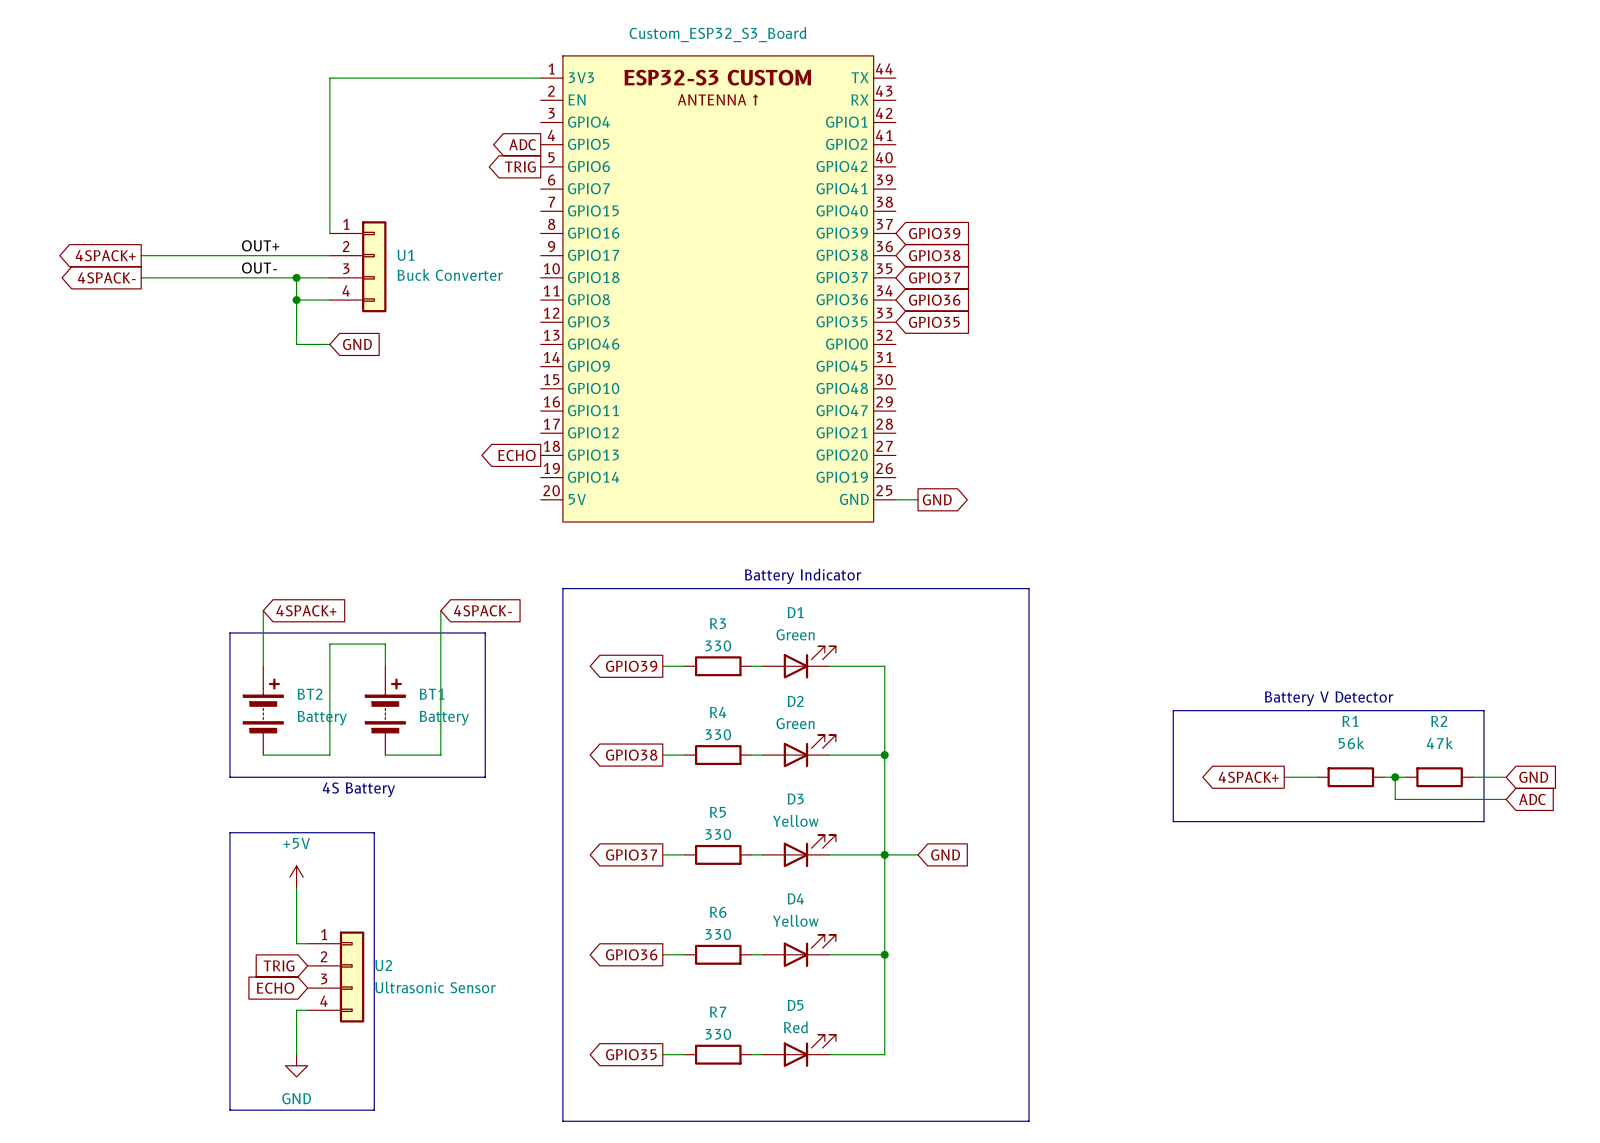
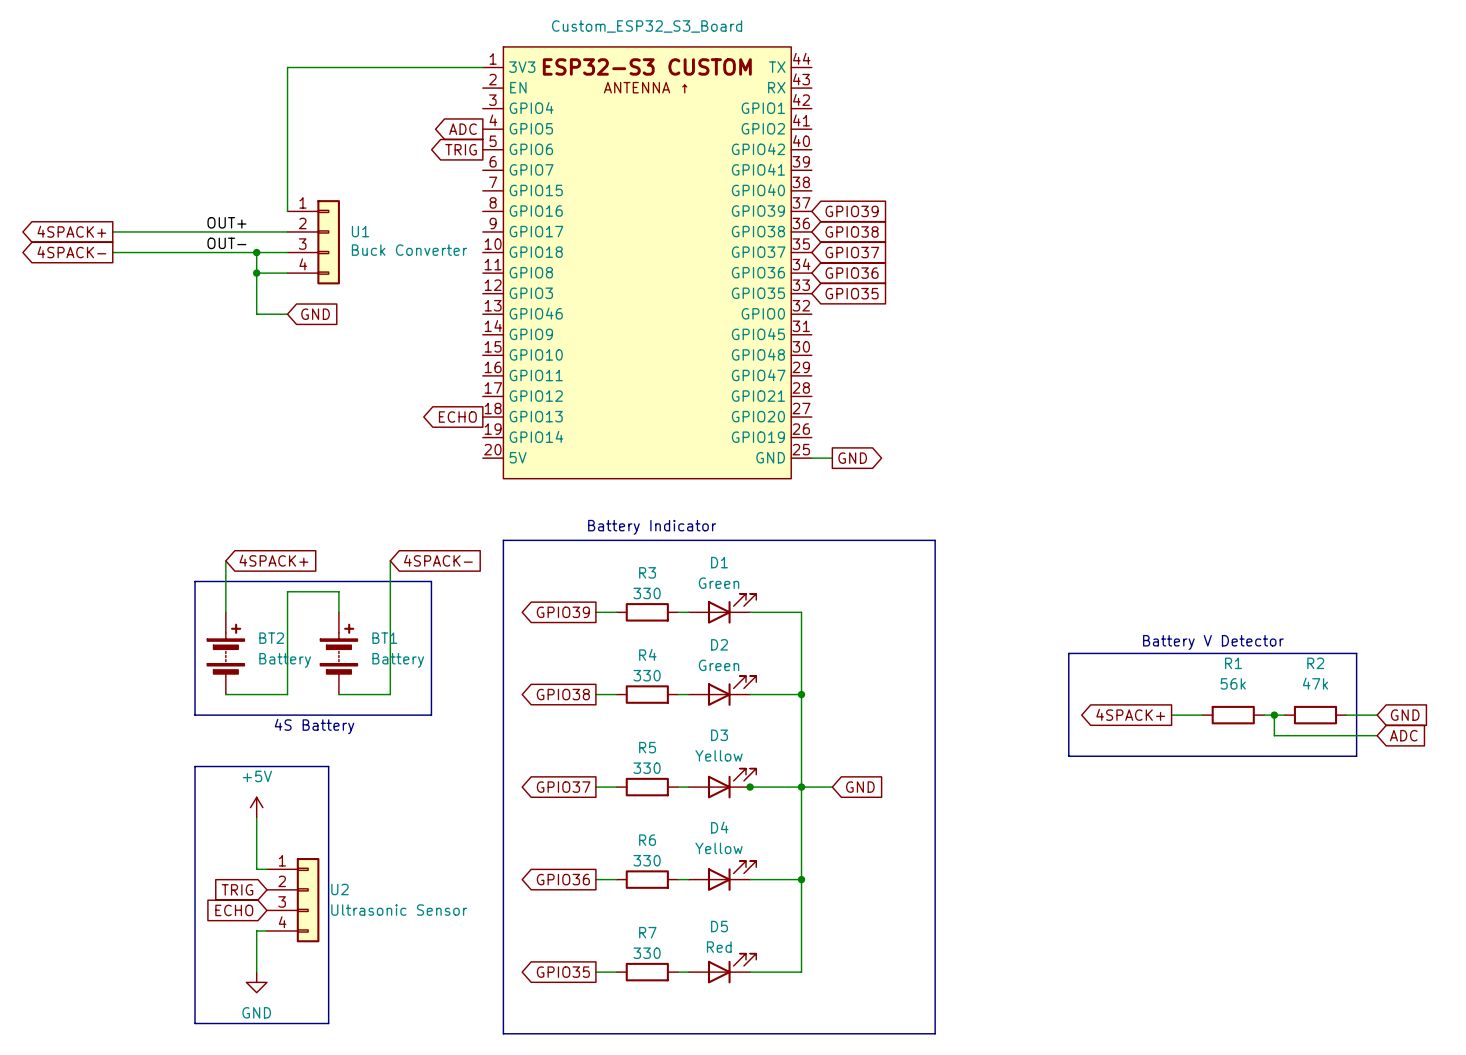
text position: Battery Indicator (803, 576) -> Battery Indicator (652, 527)
junction: none -> (750, 787)

